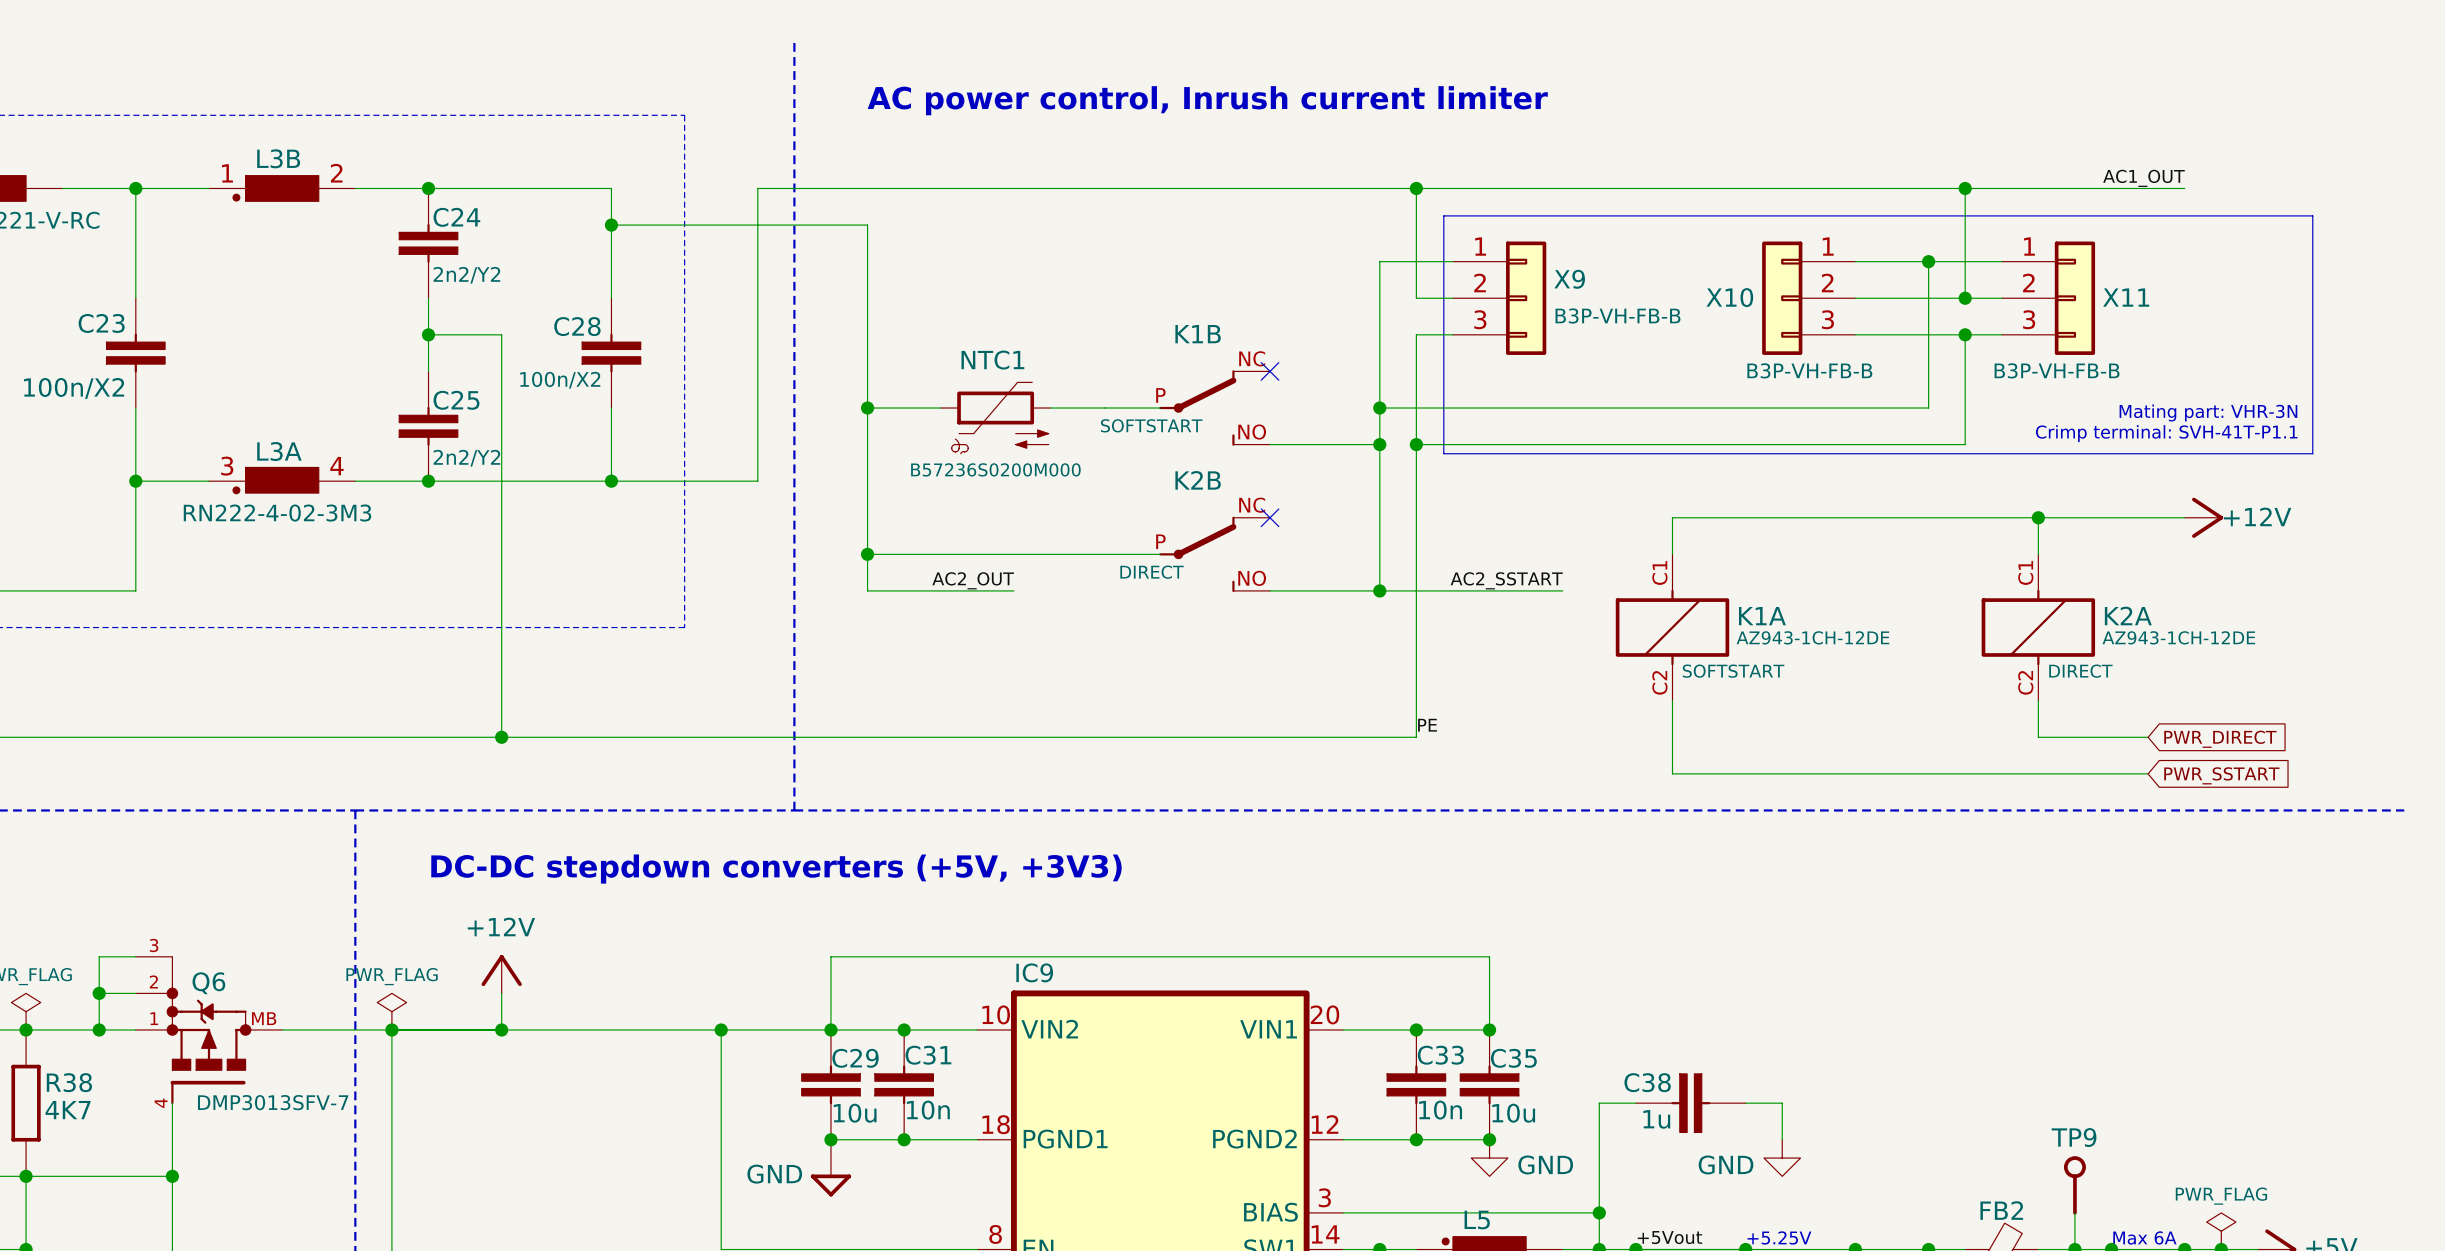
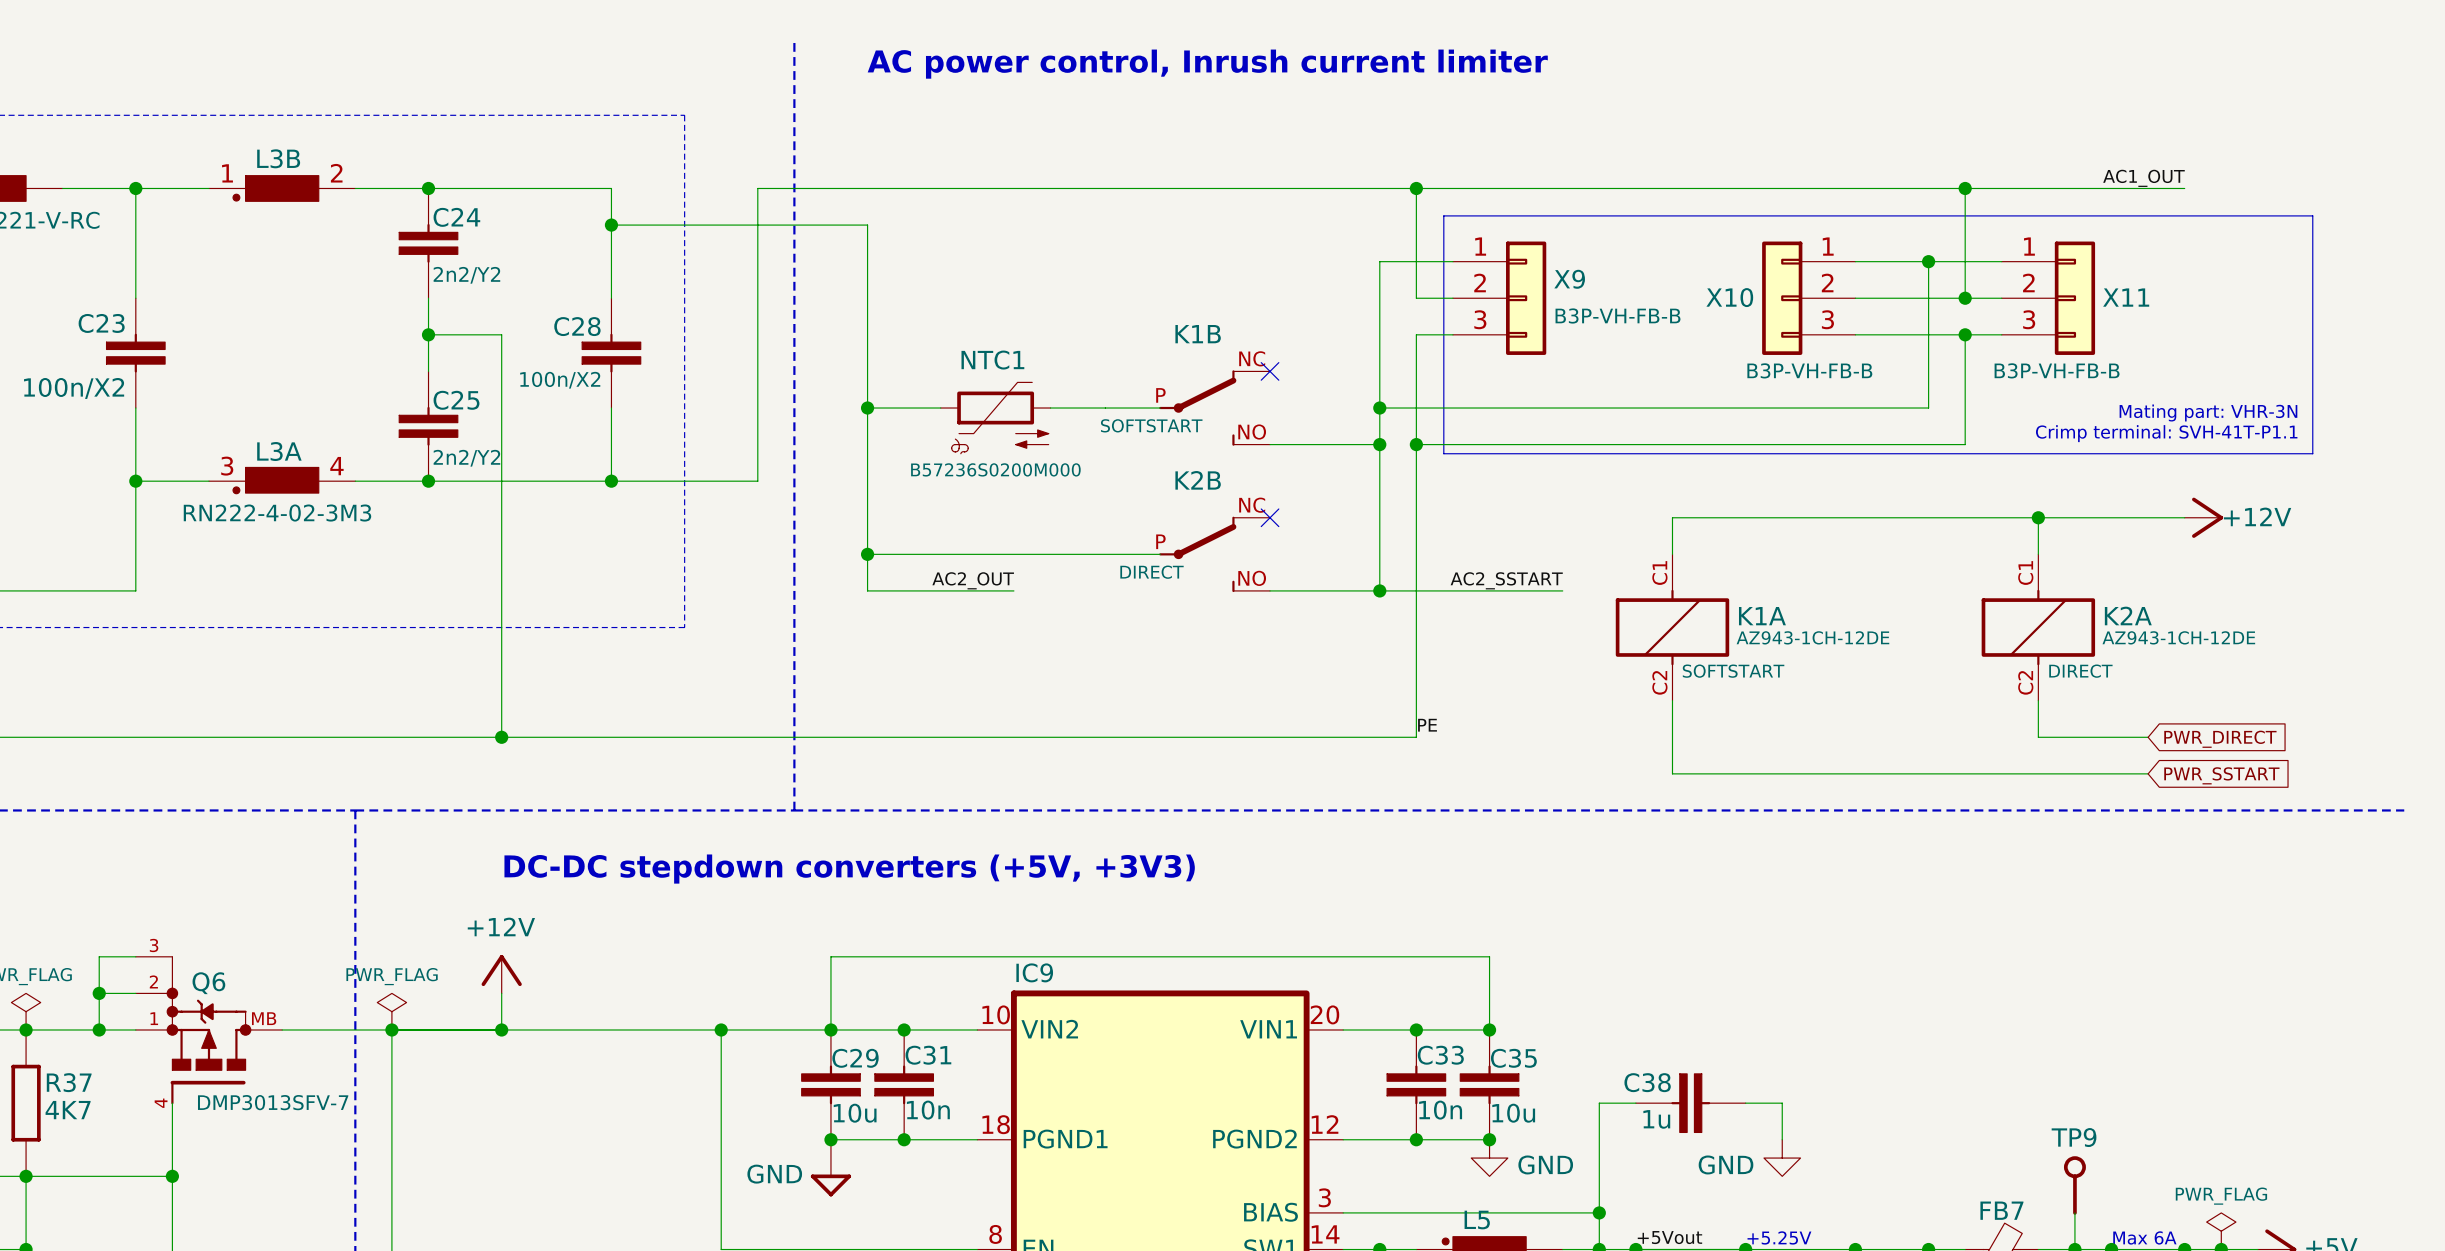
text position: AC power control, Inrush current limiter (1207, 100) -> AC power control, Inrush current limiter (1207, 64)
text position: DC-DC stepdown converters (+5V, +3V3) (776, 869) -> DC-DC stepdown converters (+5V, +3V3) (849, 869)
R38 name: R38 (69, 1082) -> R37 (69, 1082)
FB2 name: FB2 (2001, 1210) -> FB7 (2001, 1210)

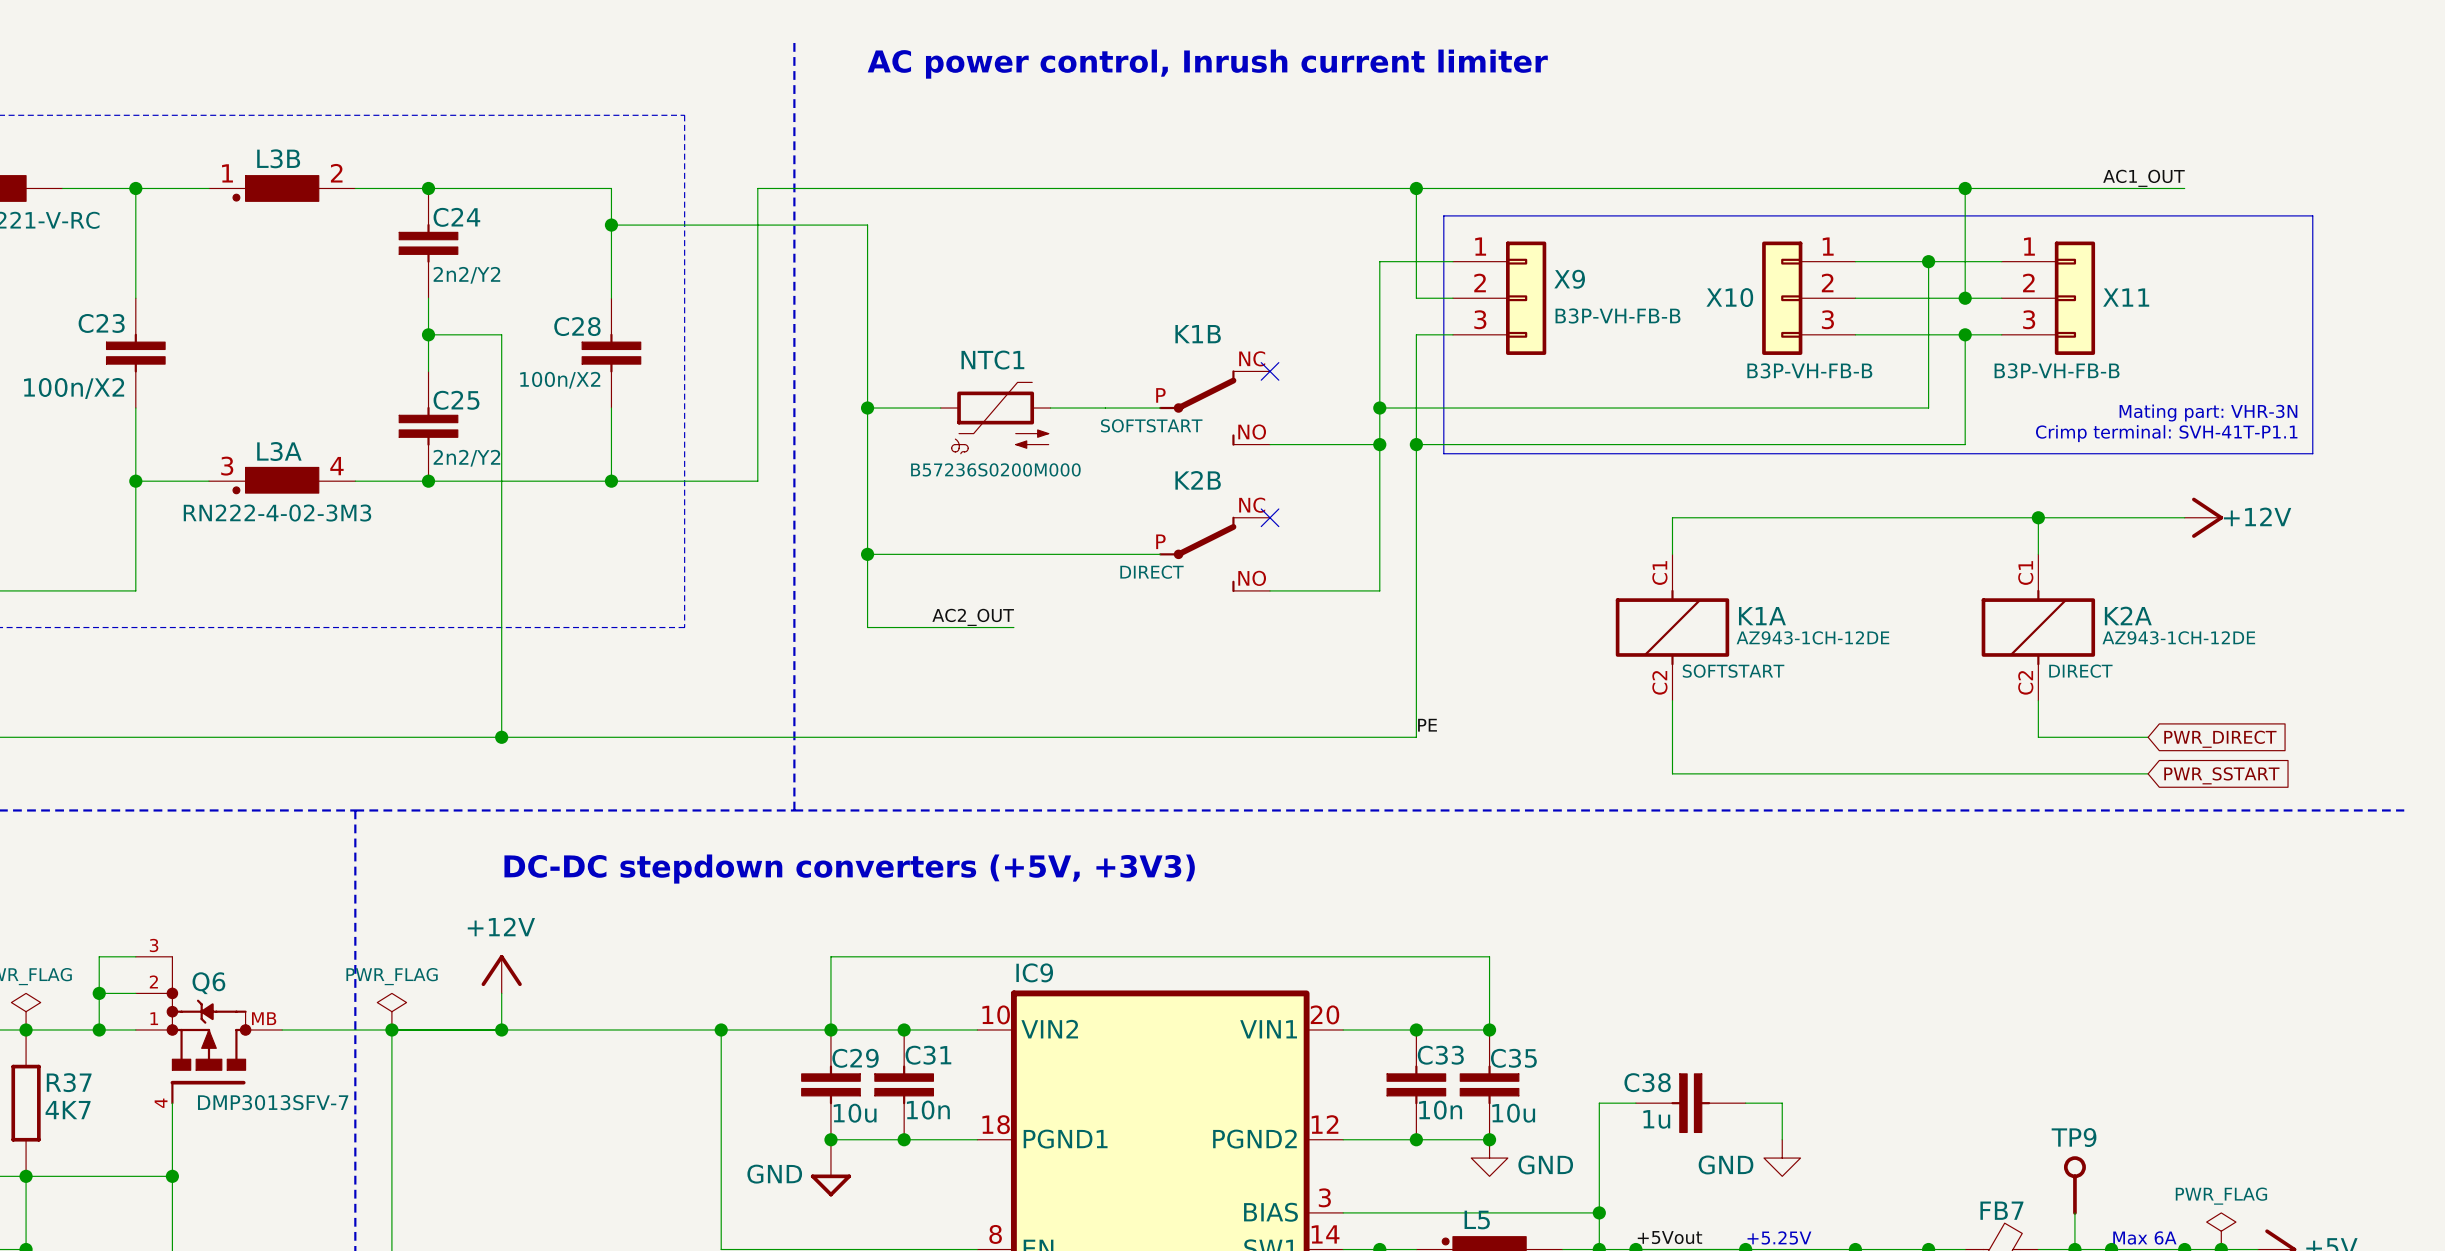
label position: AC2_OUT (973, 580) -> AC2_OUT (973, 617)
label: AC2_SSTART (1506, 580) -> none
wire: (867, 590) (1013, 590) -> (867, 590) (867, 627) (1013, 627)
wire: (1379, 590) (1562, 590) -> none
junction: (1379, 590) -> none

